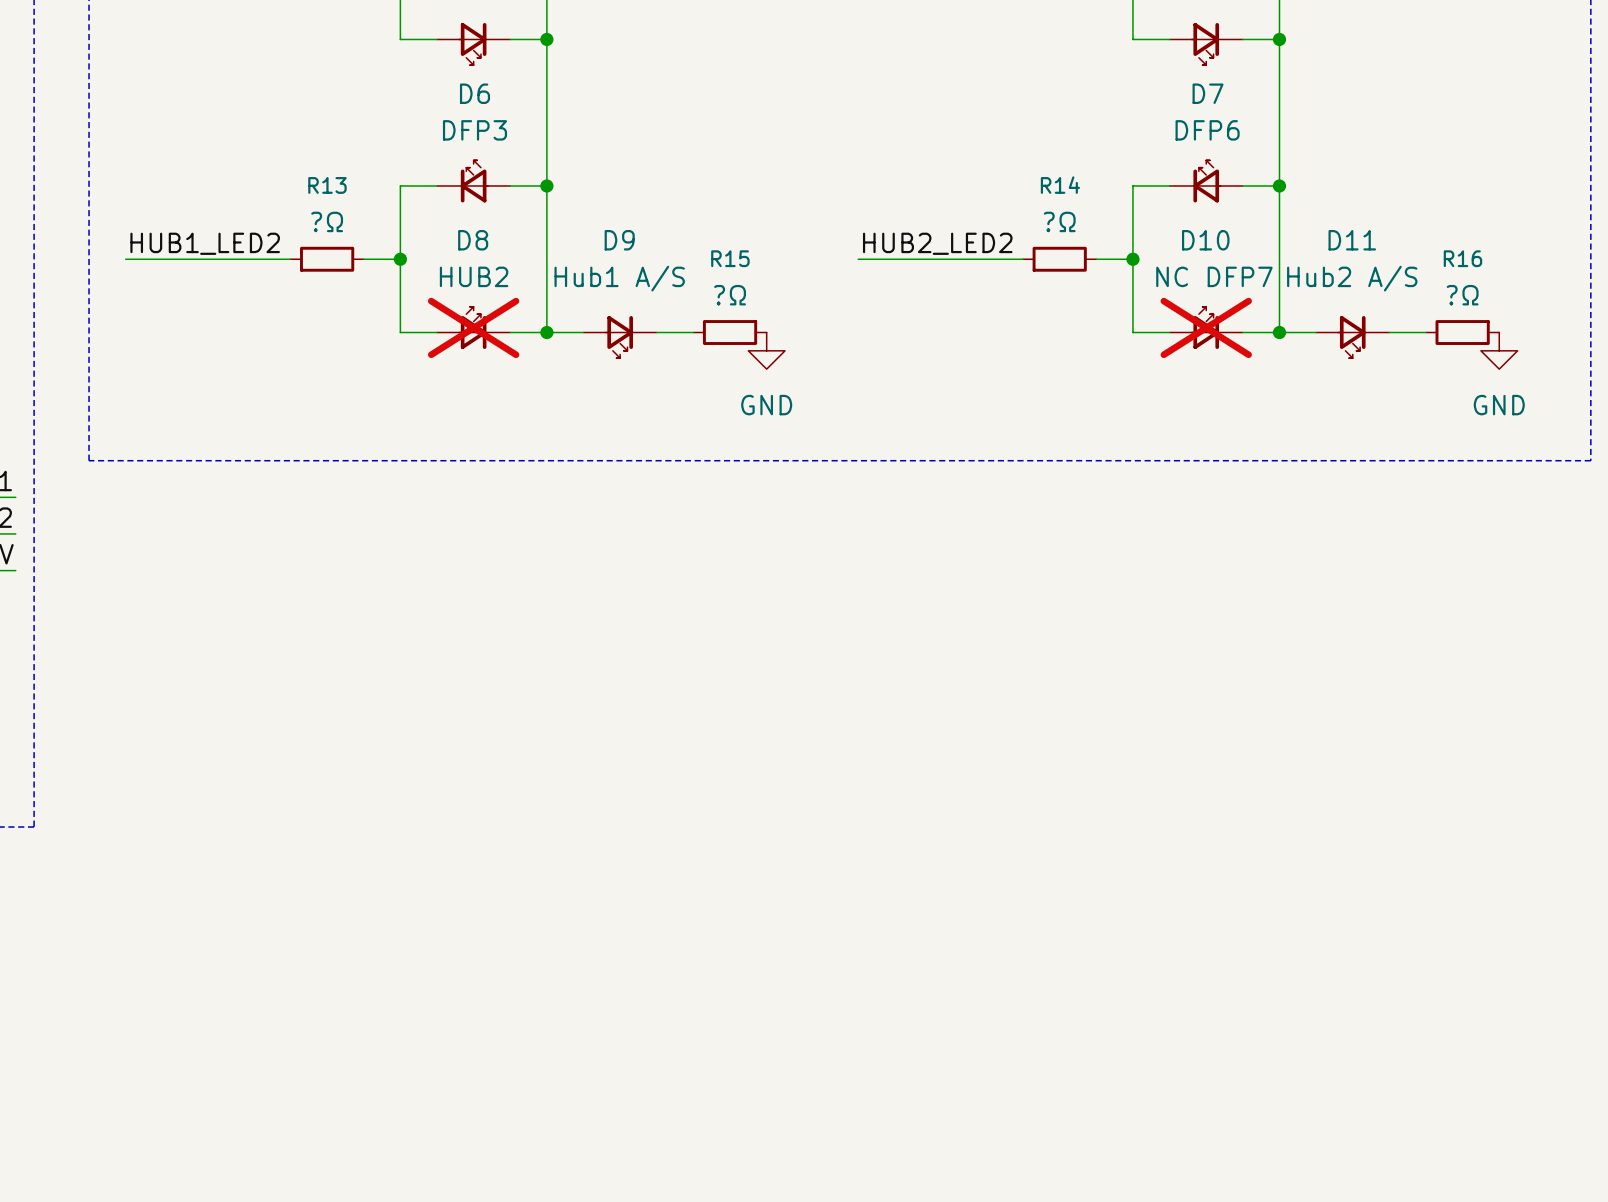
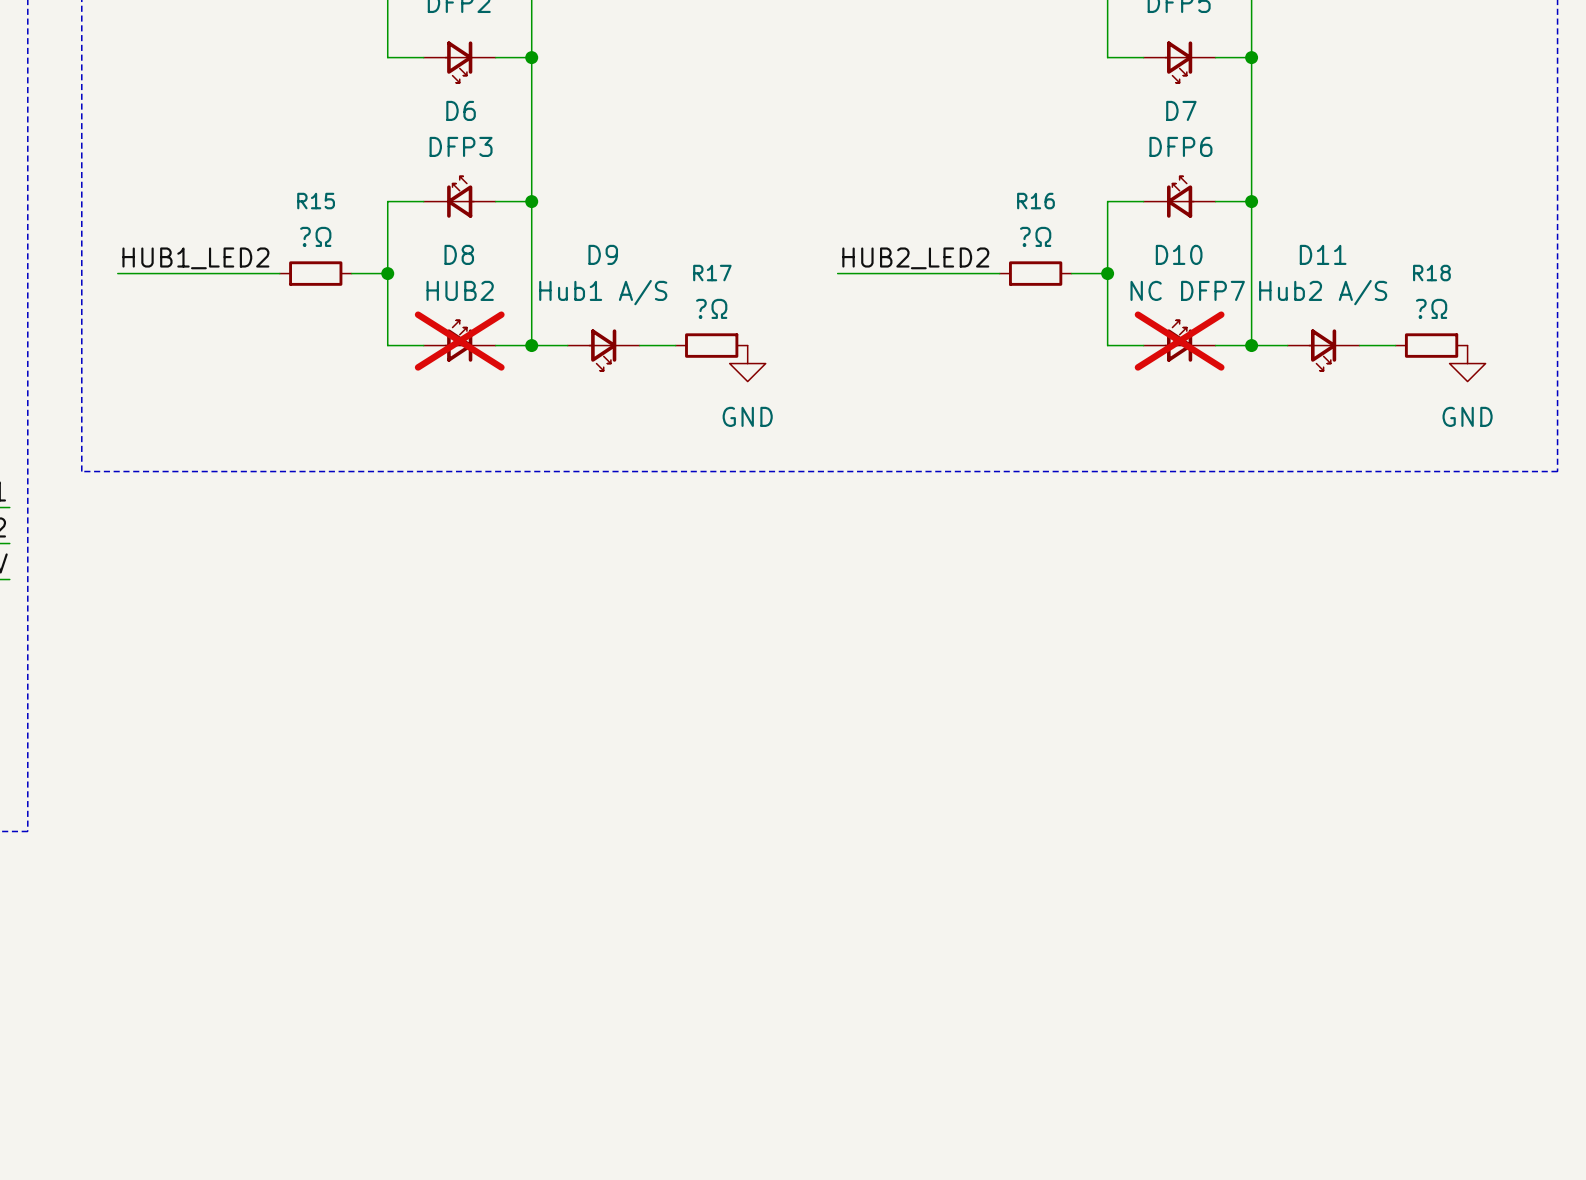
R13 name: R13 (327, 185) -> R15 (316, 201)
R14 name: R14 (1060, 185) -> R16 (1035, 201)
R15 name: R15 (730, 258) -> R17 (712, 273)
R16 name: R16 (1462, 258) -> R18 (1431, 273)

